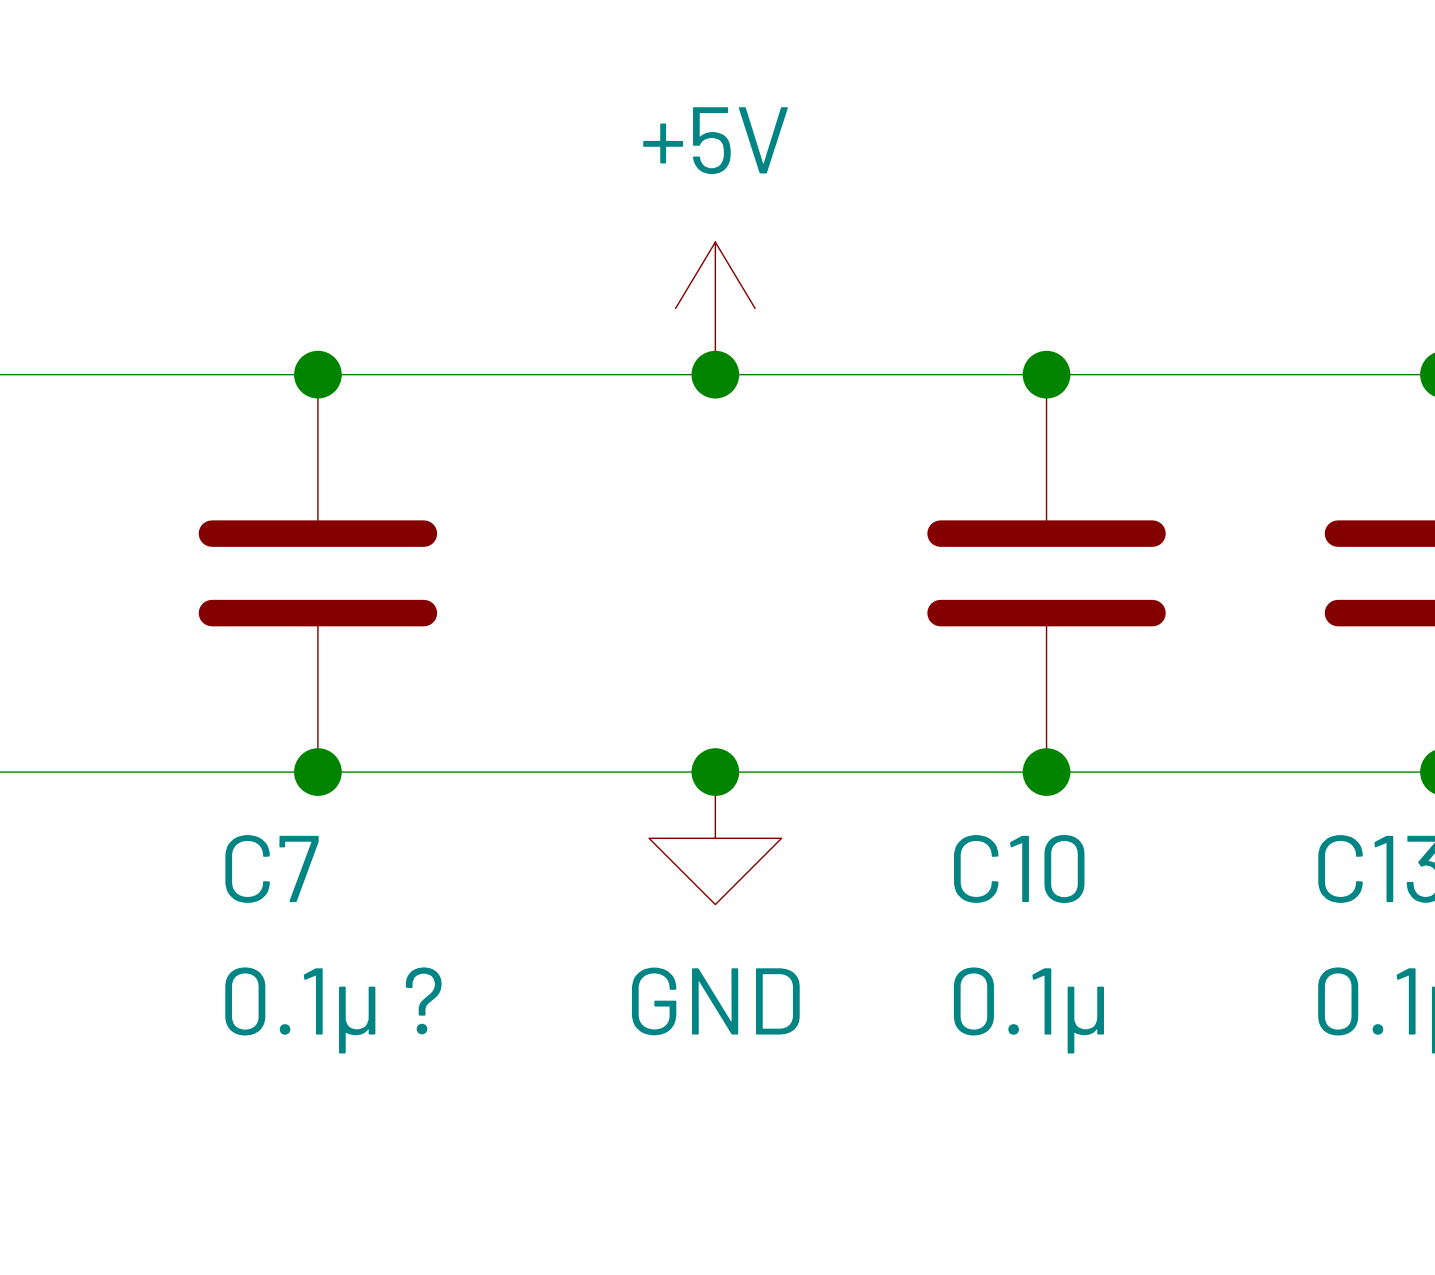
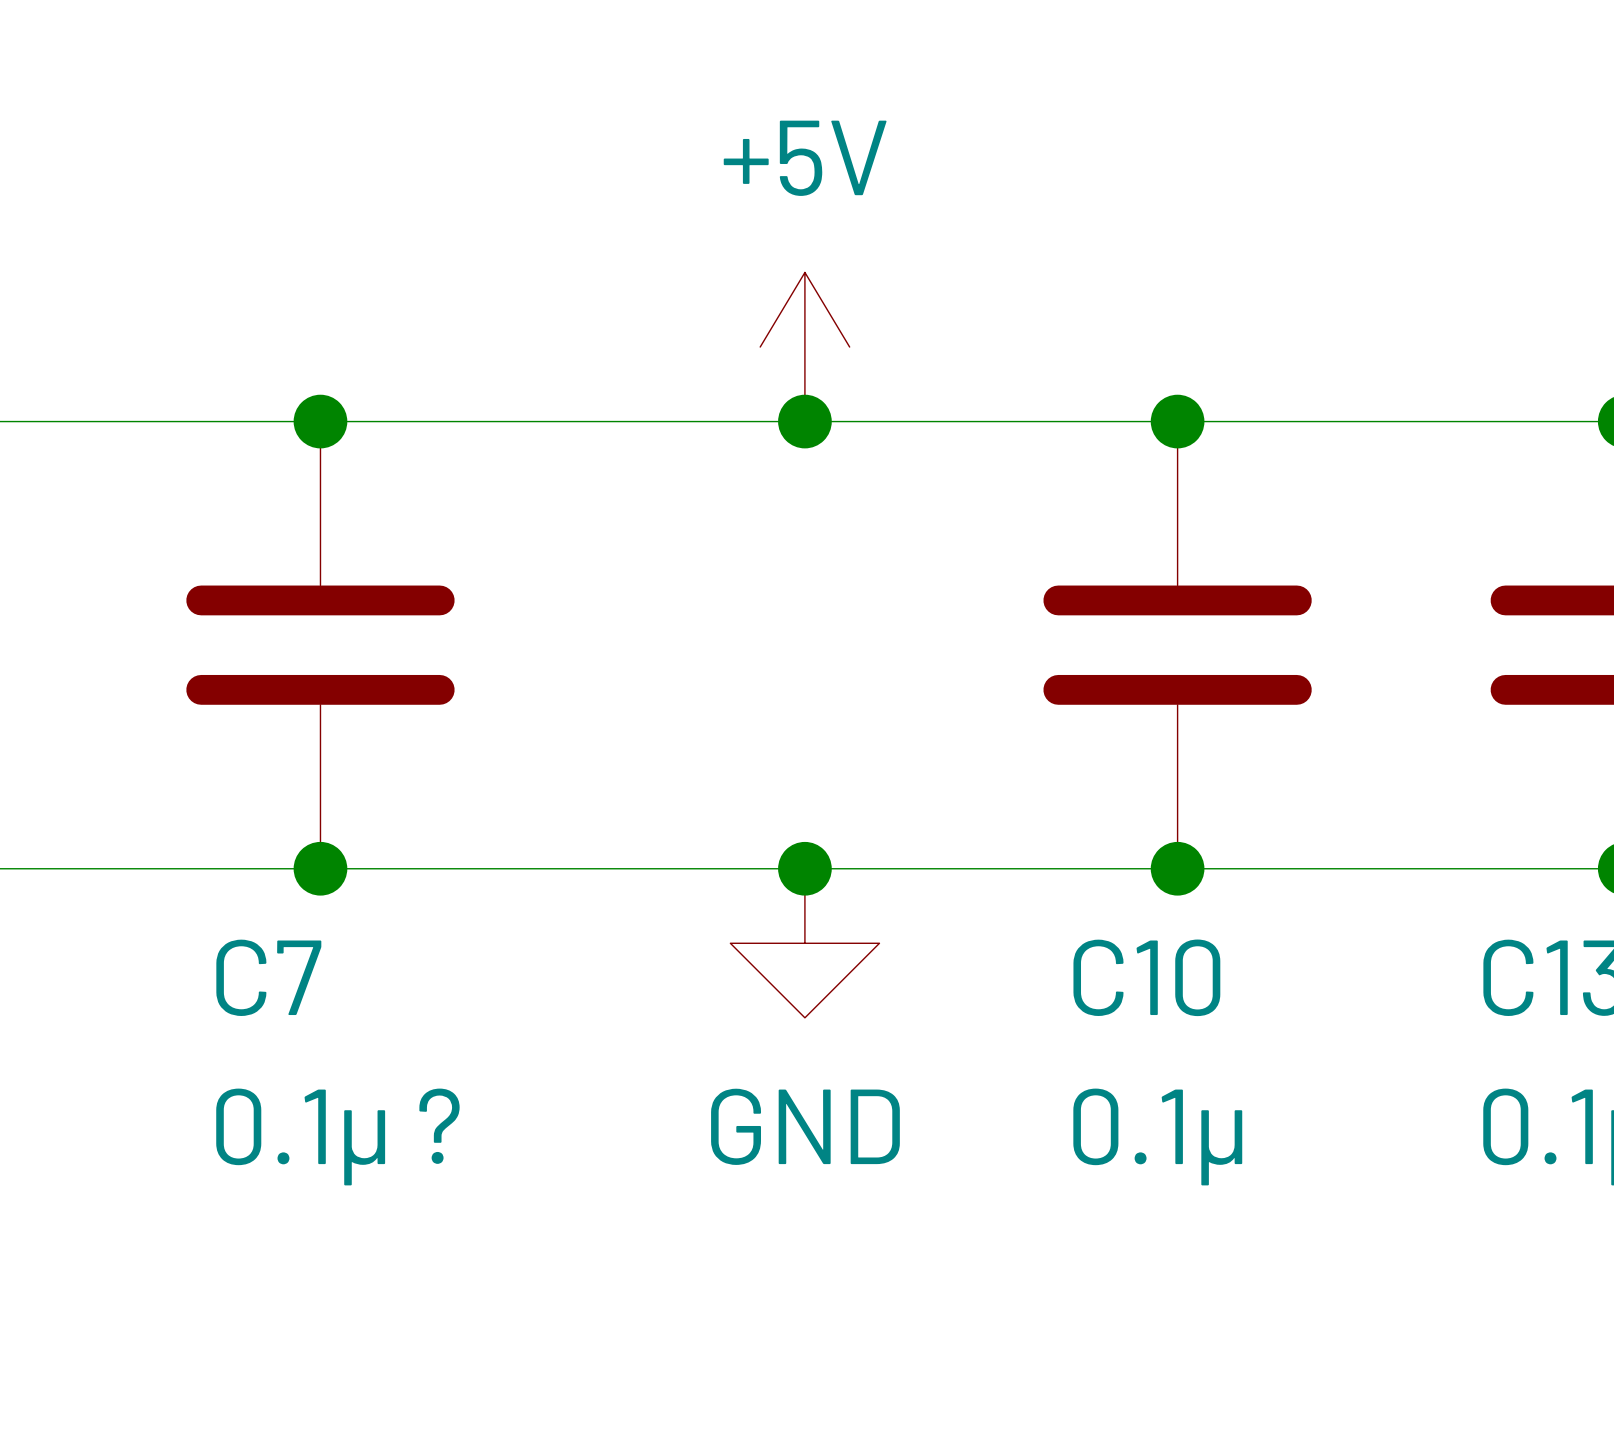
junction position: (317, 374) -> (320, 421)
C7 position: (317, 573) -> (320, 645)
junction position: (317, 772) -> (320, 868)

